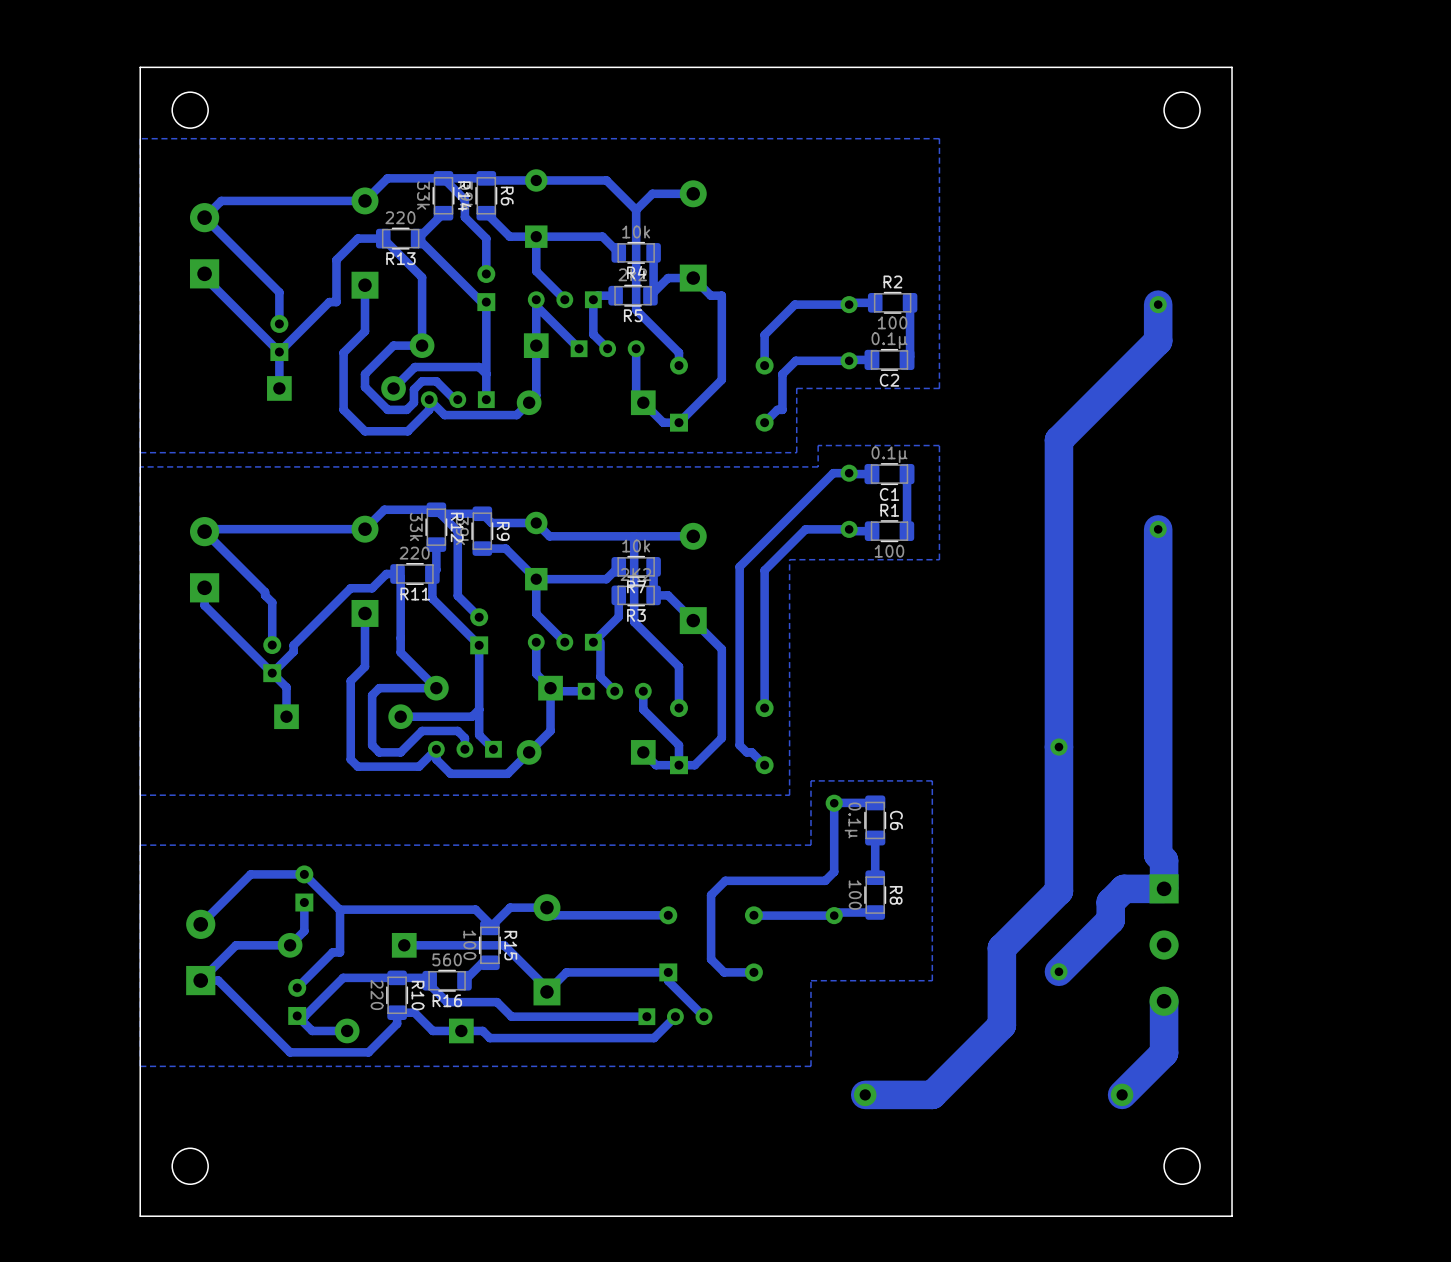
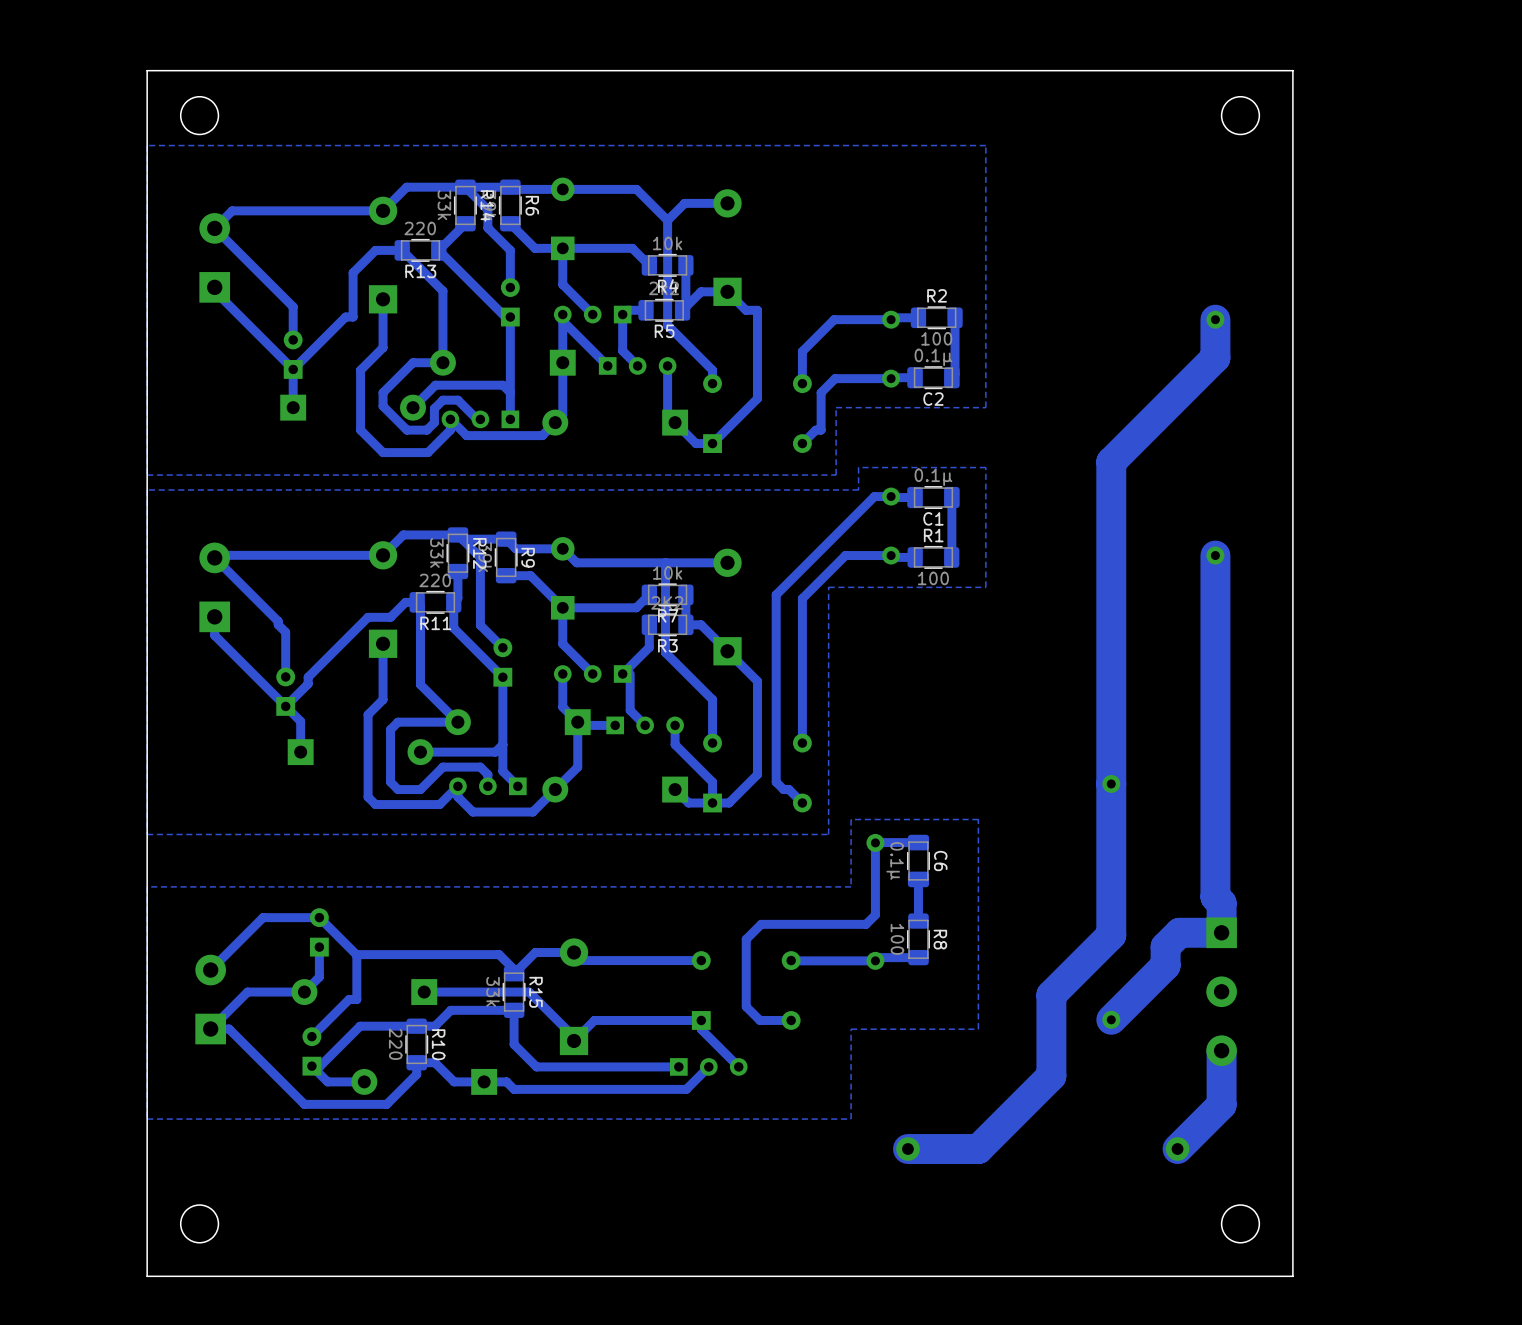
R15 value: 100 (469, 945) -> 33k (493, 991)
bottom track: (482, 962) (464, 980) -> (506, 1010) (450, 1010) (435, 1026)
bottom track: (414, 977) (426, 977) (429, 980) (429, 984) (447, 1002) (497, 1002) (511, 1016) -> (514, 1010) (514, 1044) (536, 1066)
R16: 560 (447, 980) -> none

